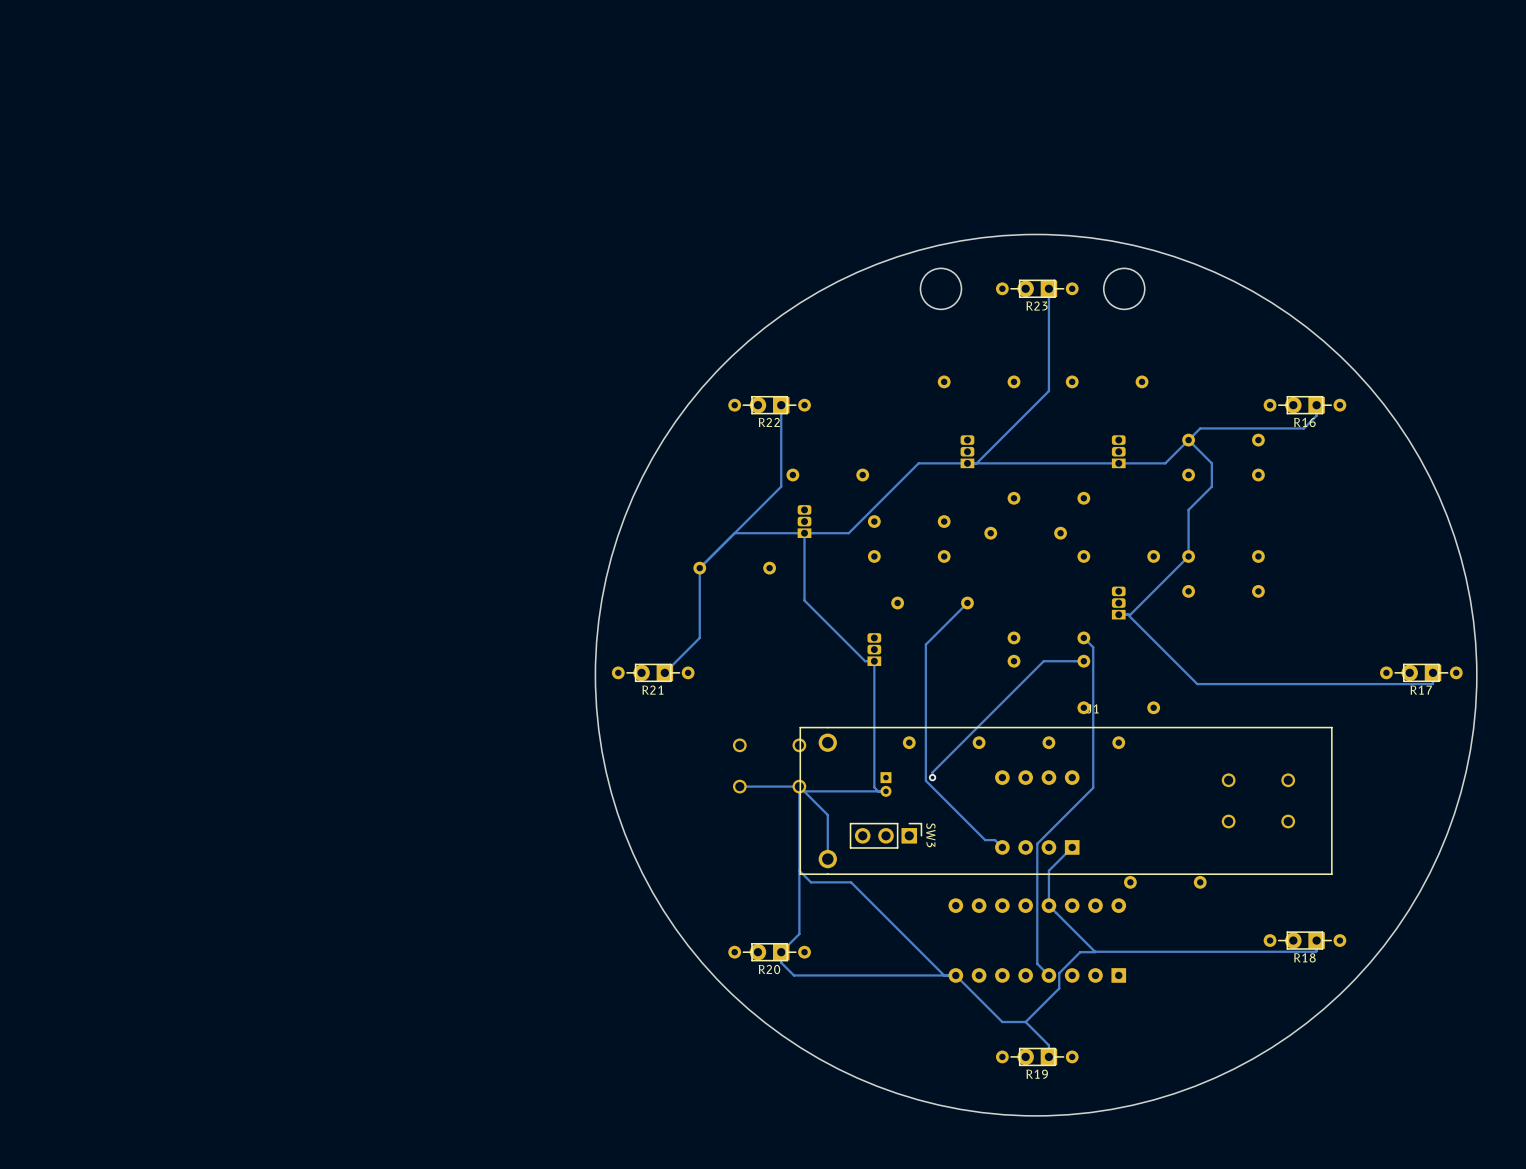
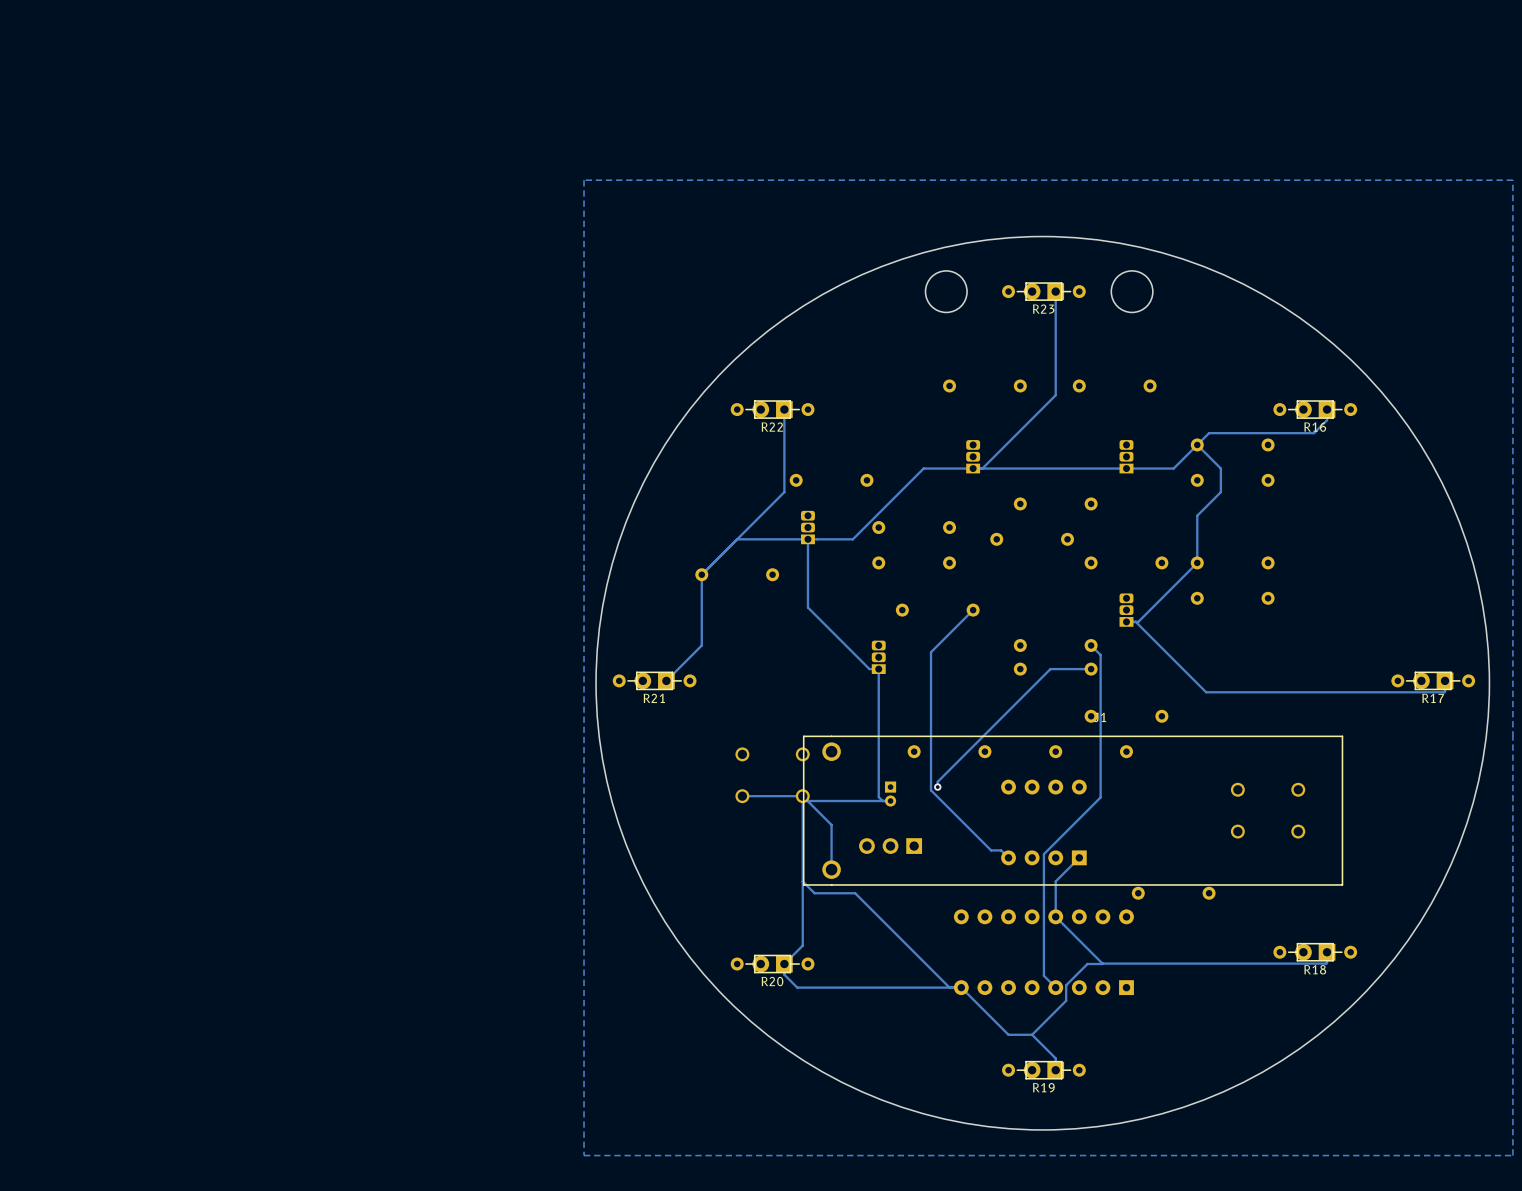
zone outline: none -> (1512, 180) (584, 180) (584, 1155) (1512, 1155) (1512, 180)
SW3 side: bottom (885, 835) -> top (890, 846)

